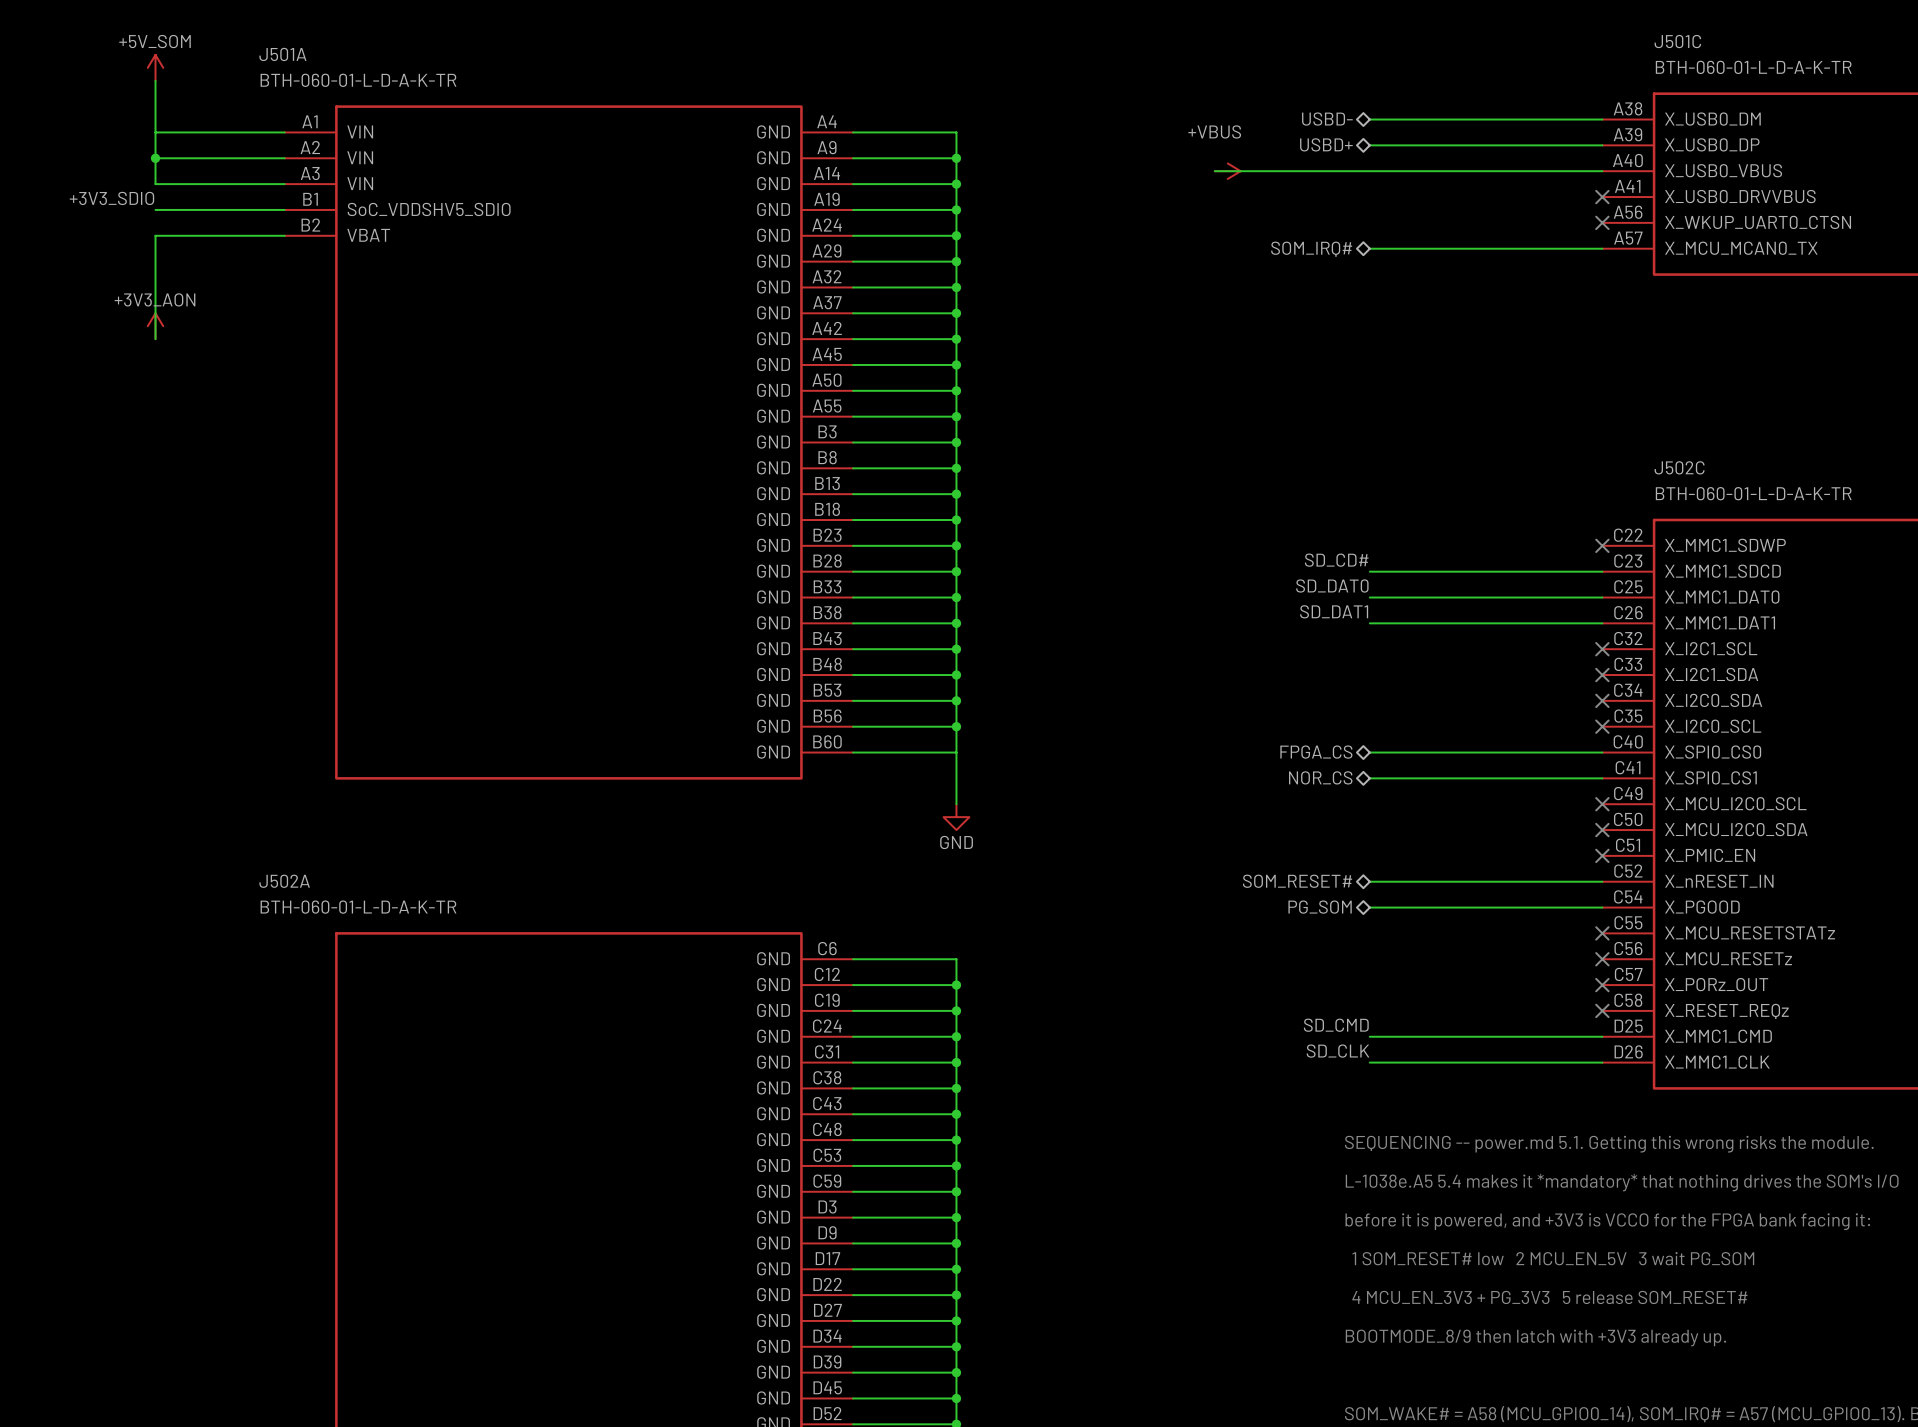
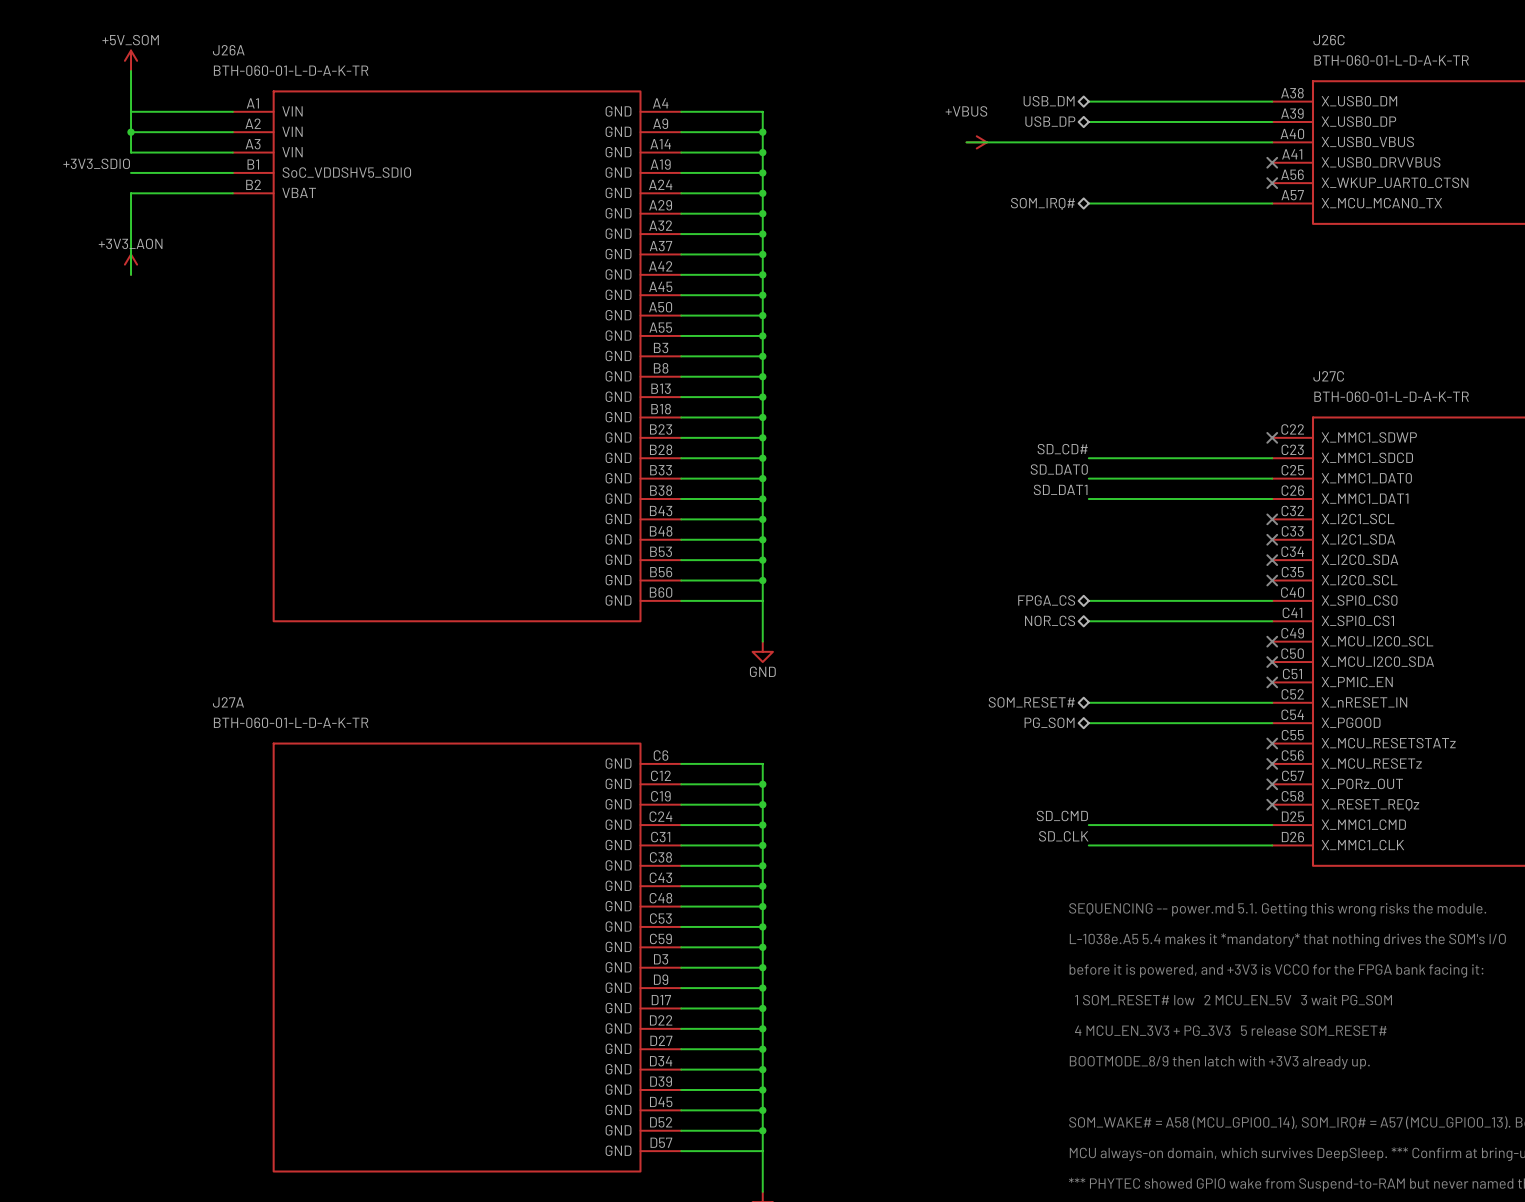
J501C name: J501C (1677, 41) -> J26C (1329, 40)
J501A name: J501A (282, 54) -> J26A (228, 50)
hierarchical label: USBD- (1327, 119) -> USB_DM (1049, 101)
hierarchical label: USBD+ (1326, 144) -> USB_DP (1050, 121)
J502C name: J502C (1679, 467) -> J27C (1328, 376)
J502A name: J502A (284, 881) -> J27A (228, 702)

